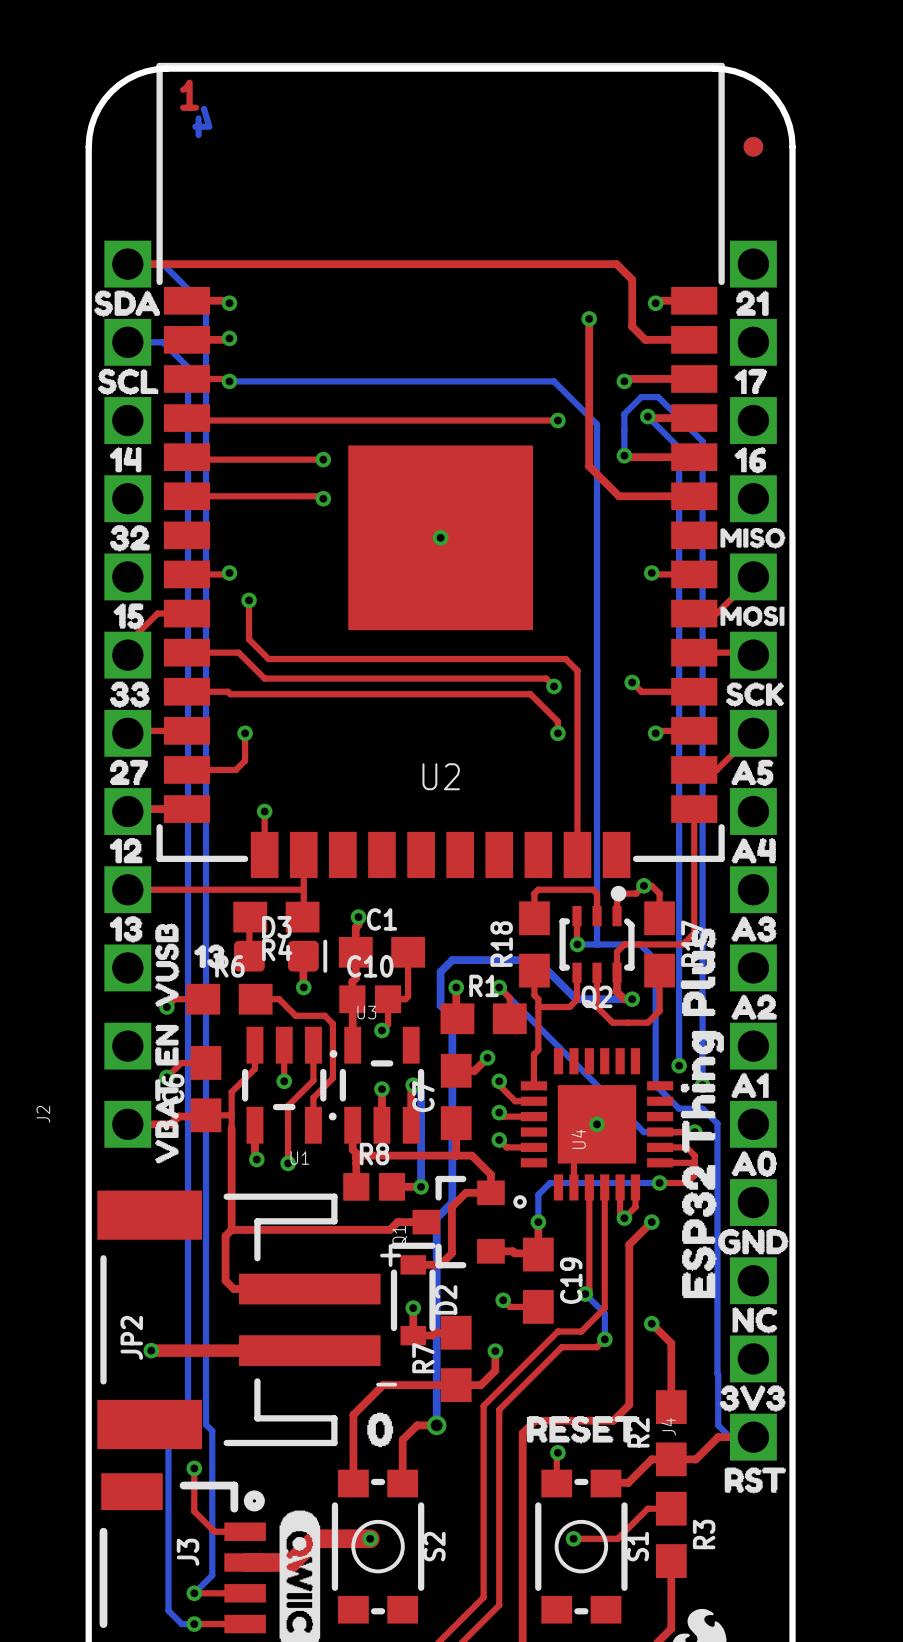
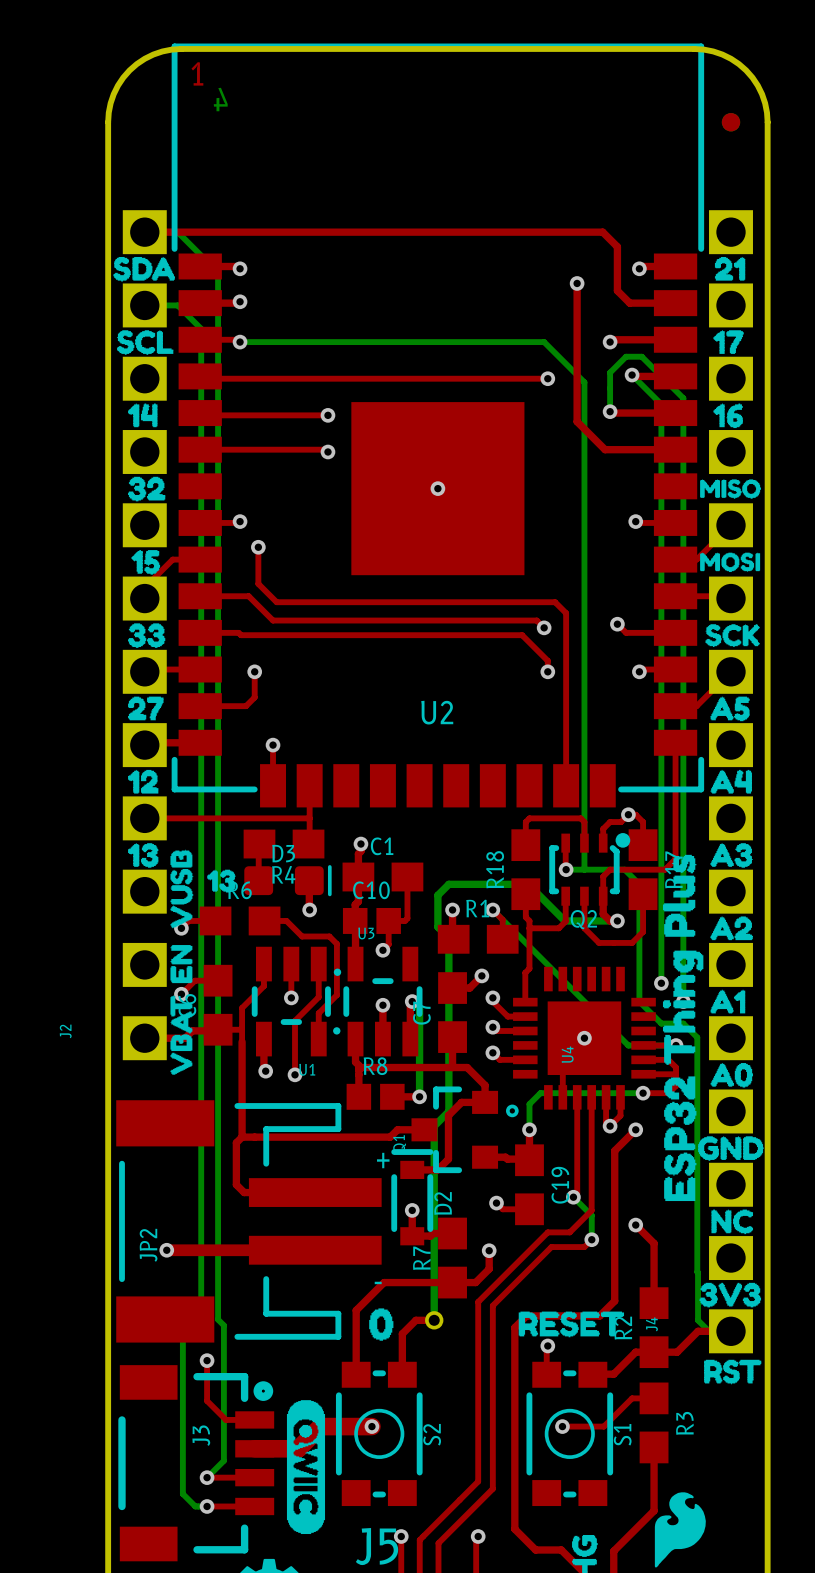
Q2 footprint: [559, 885, 635, 983] -> [549, 833, 631, 906]

